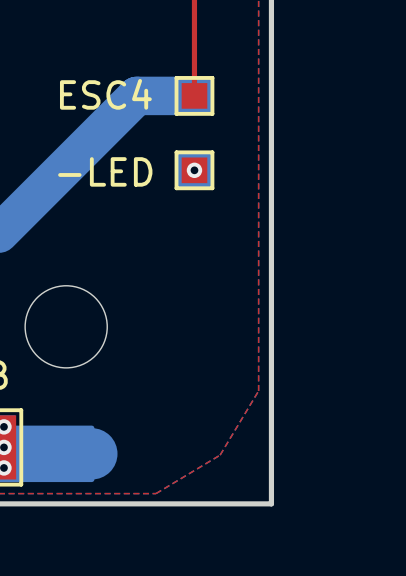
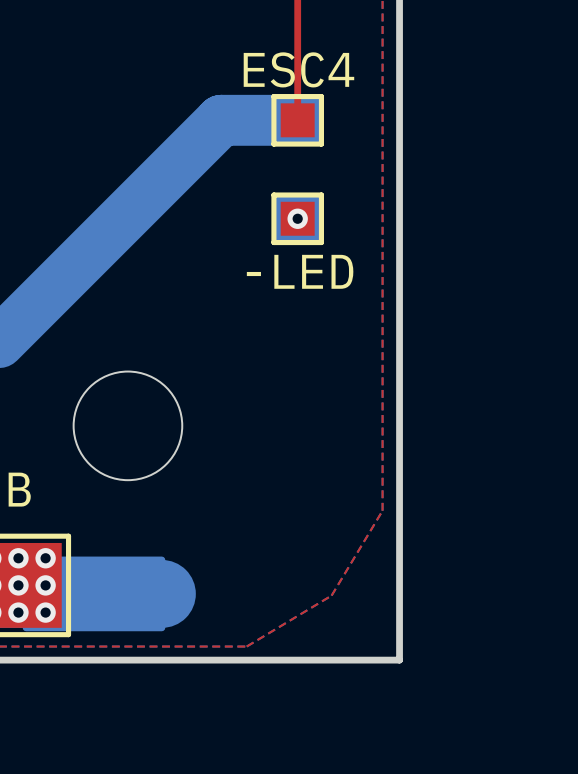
ESC4 name position: ESC4 (105, 94) -> ESC4 (298, 69)
text position: -LED (105, 171) -> -LED (300, 271)

